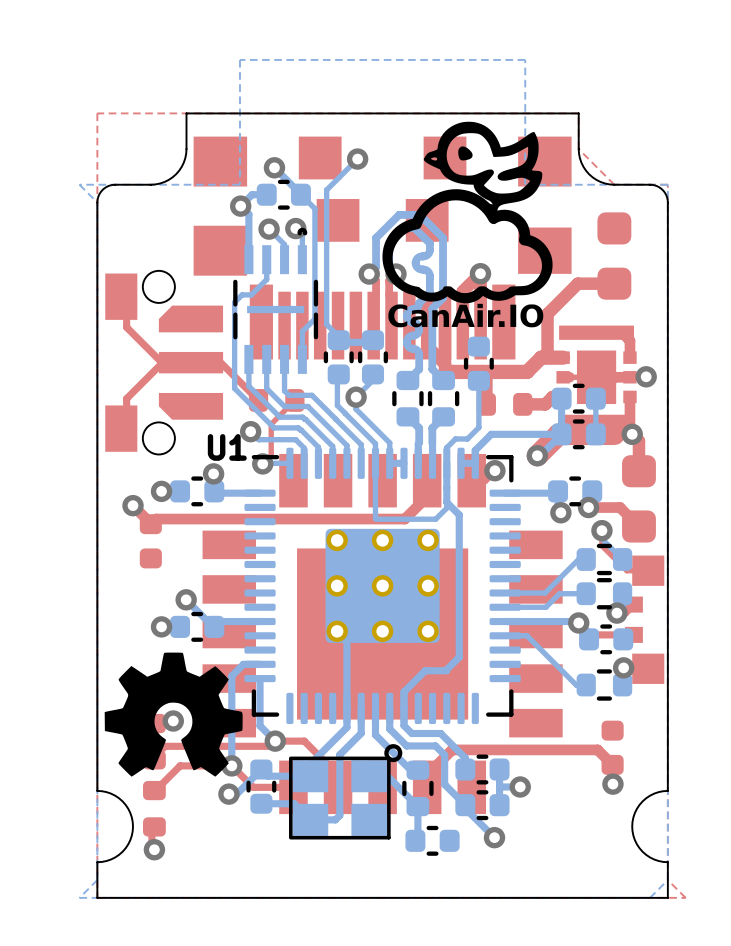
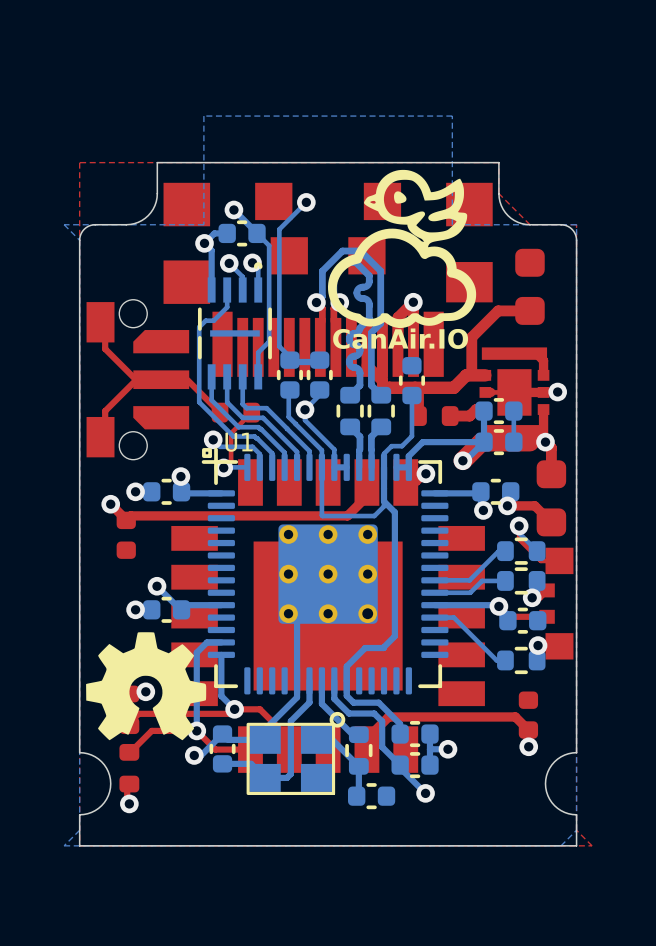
U1 name position: U1 (227, 447) -> U1 (239, 442)
U1 footprint: [244, 447, 521, 725] -> [201, 447, 449, 695]

